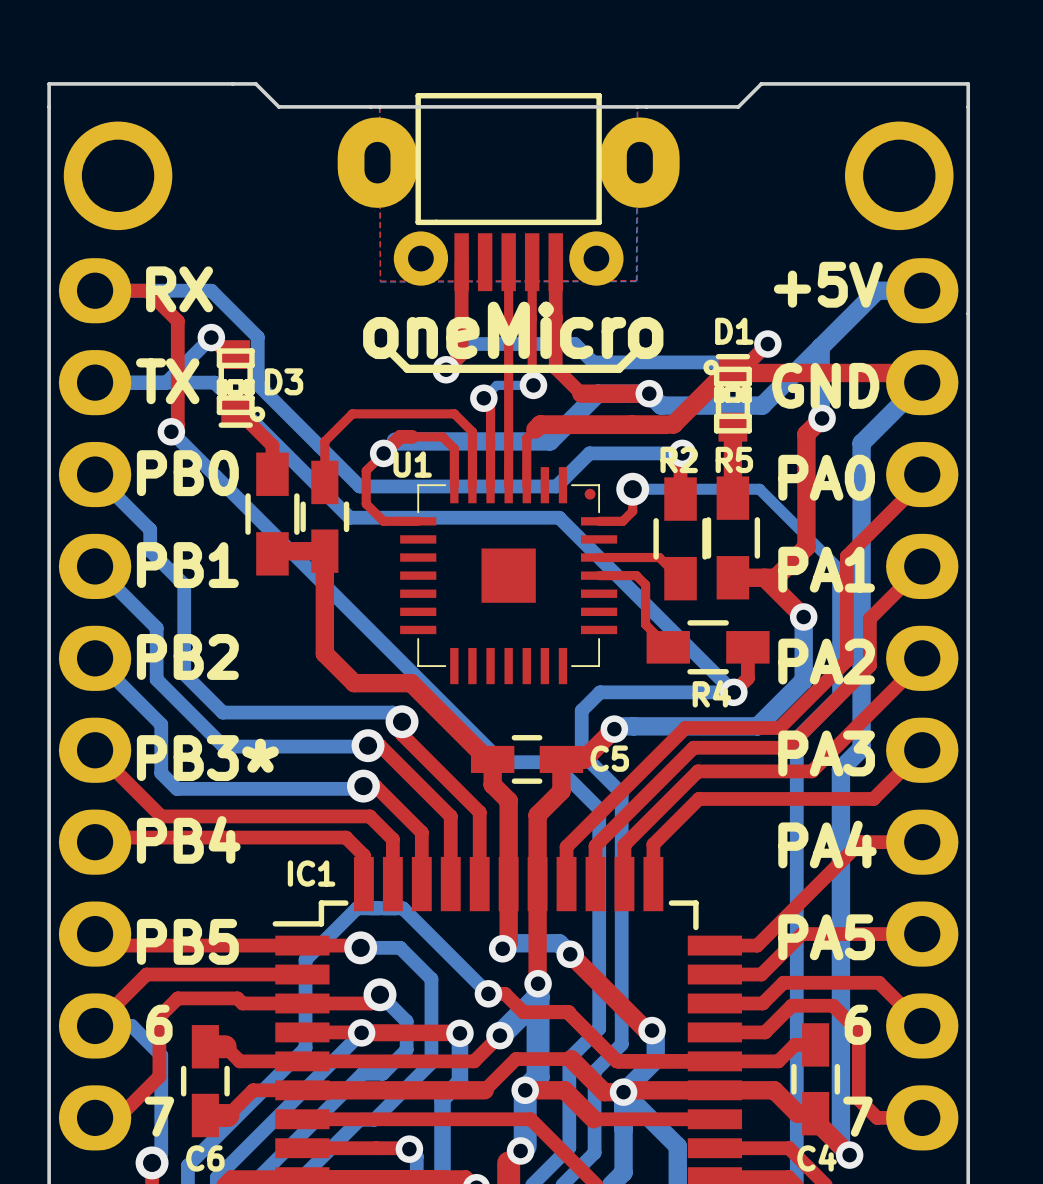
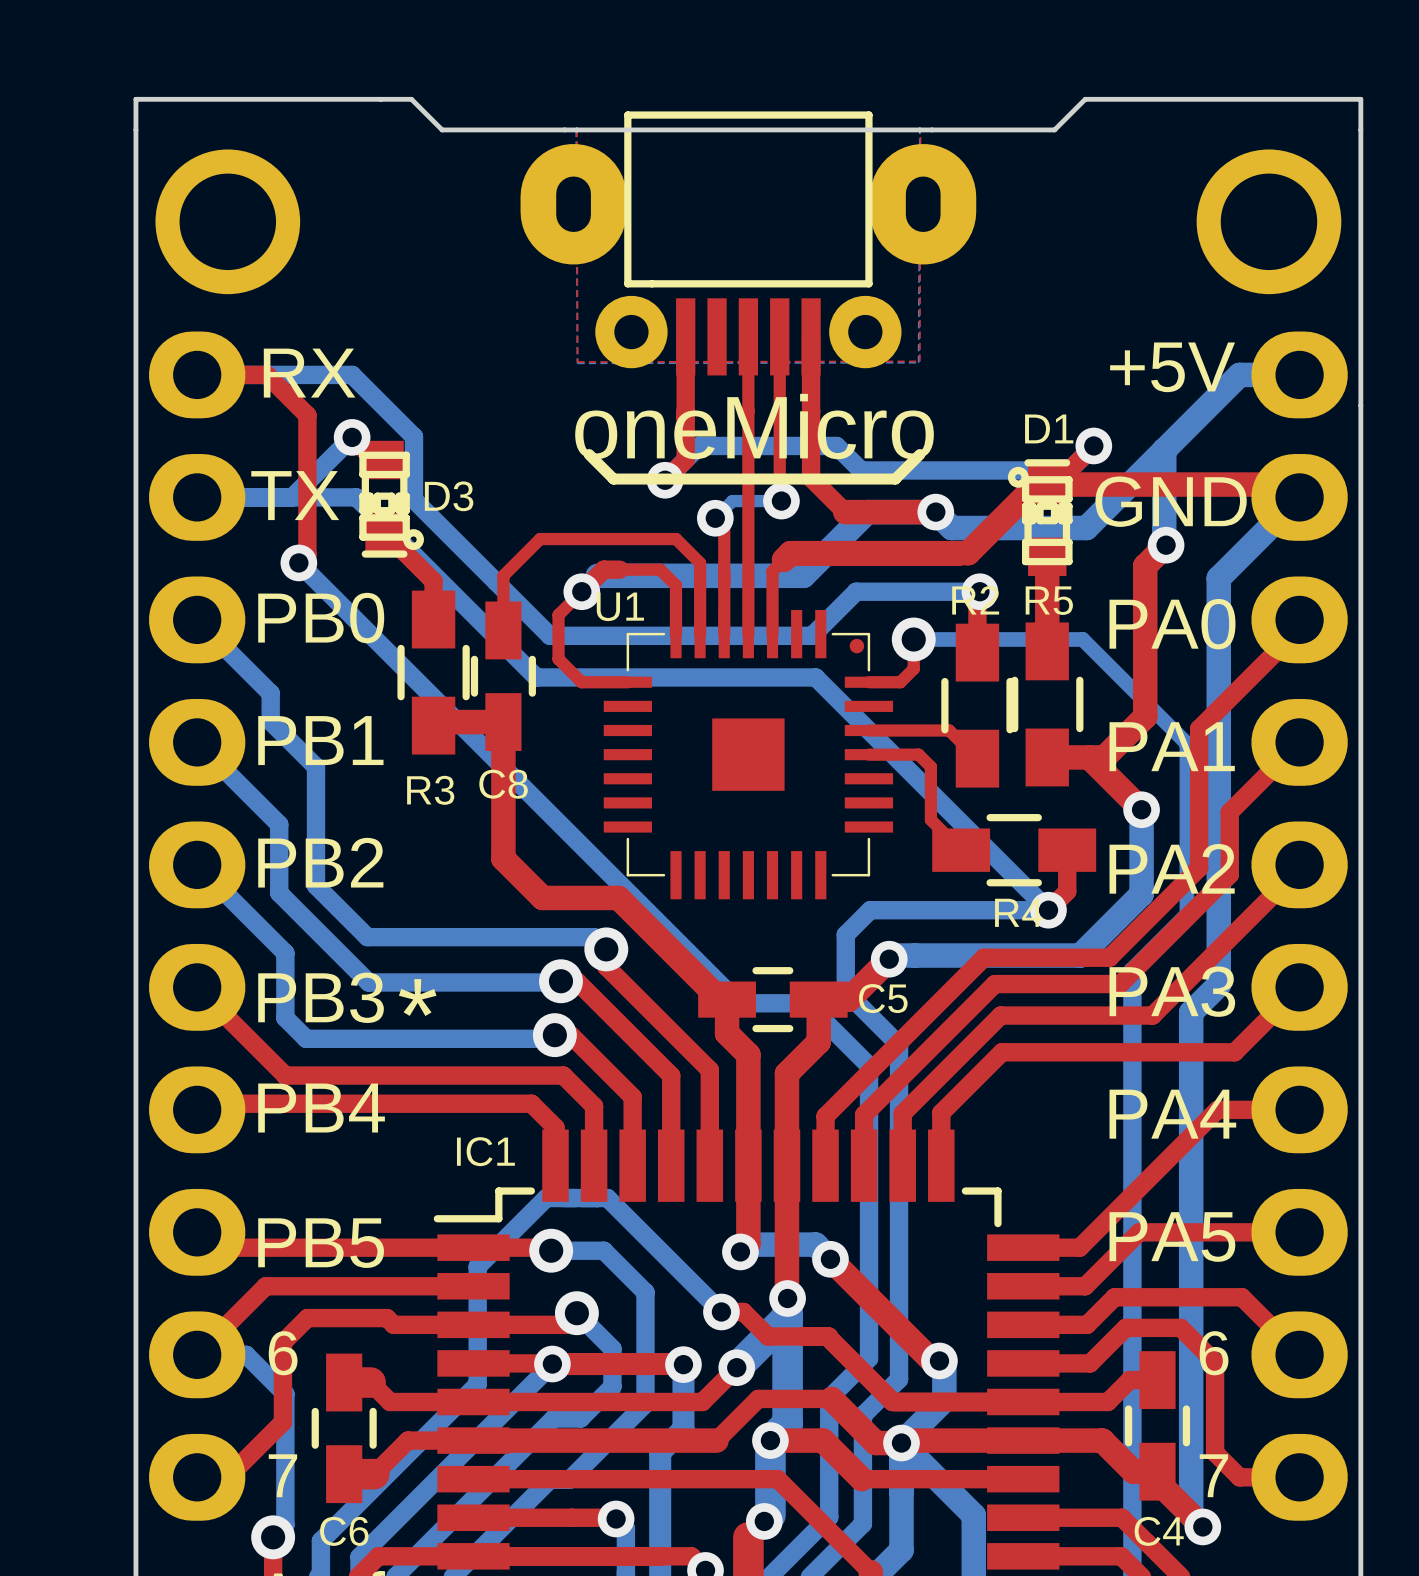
C8 name: none -> C8 (503, 784)
R3 name: none -> R3 (430, 790)

